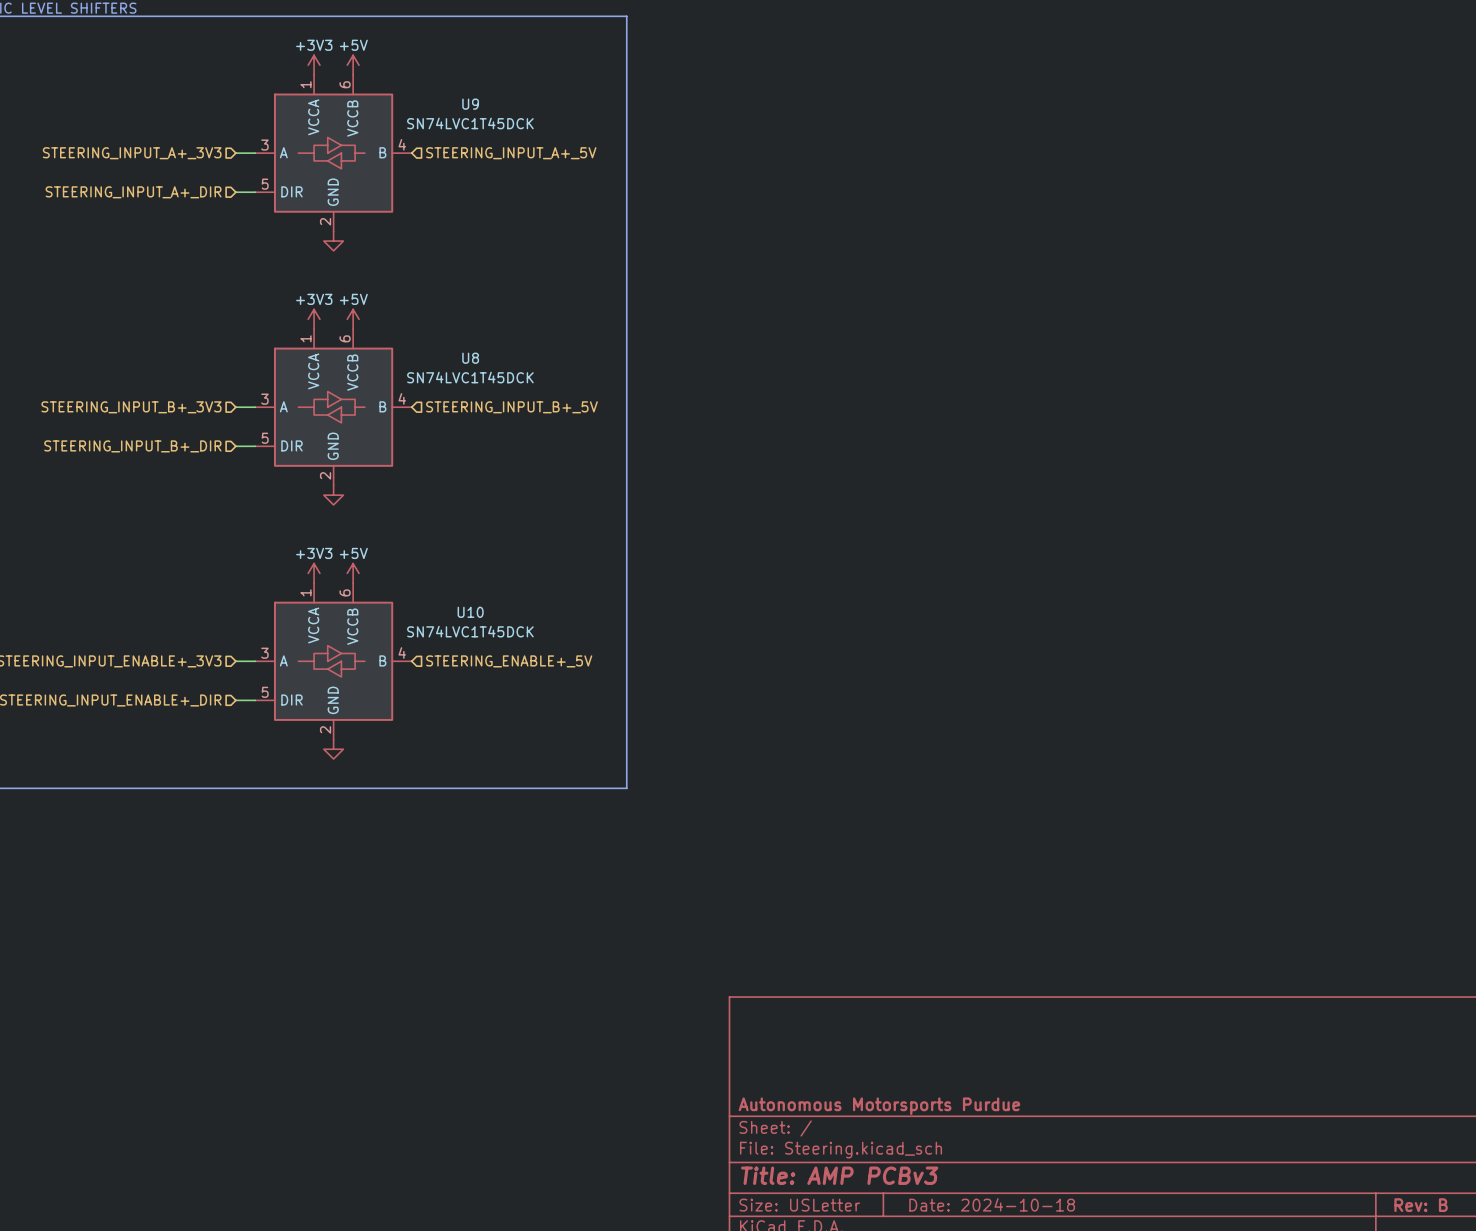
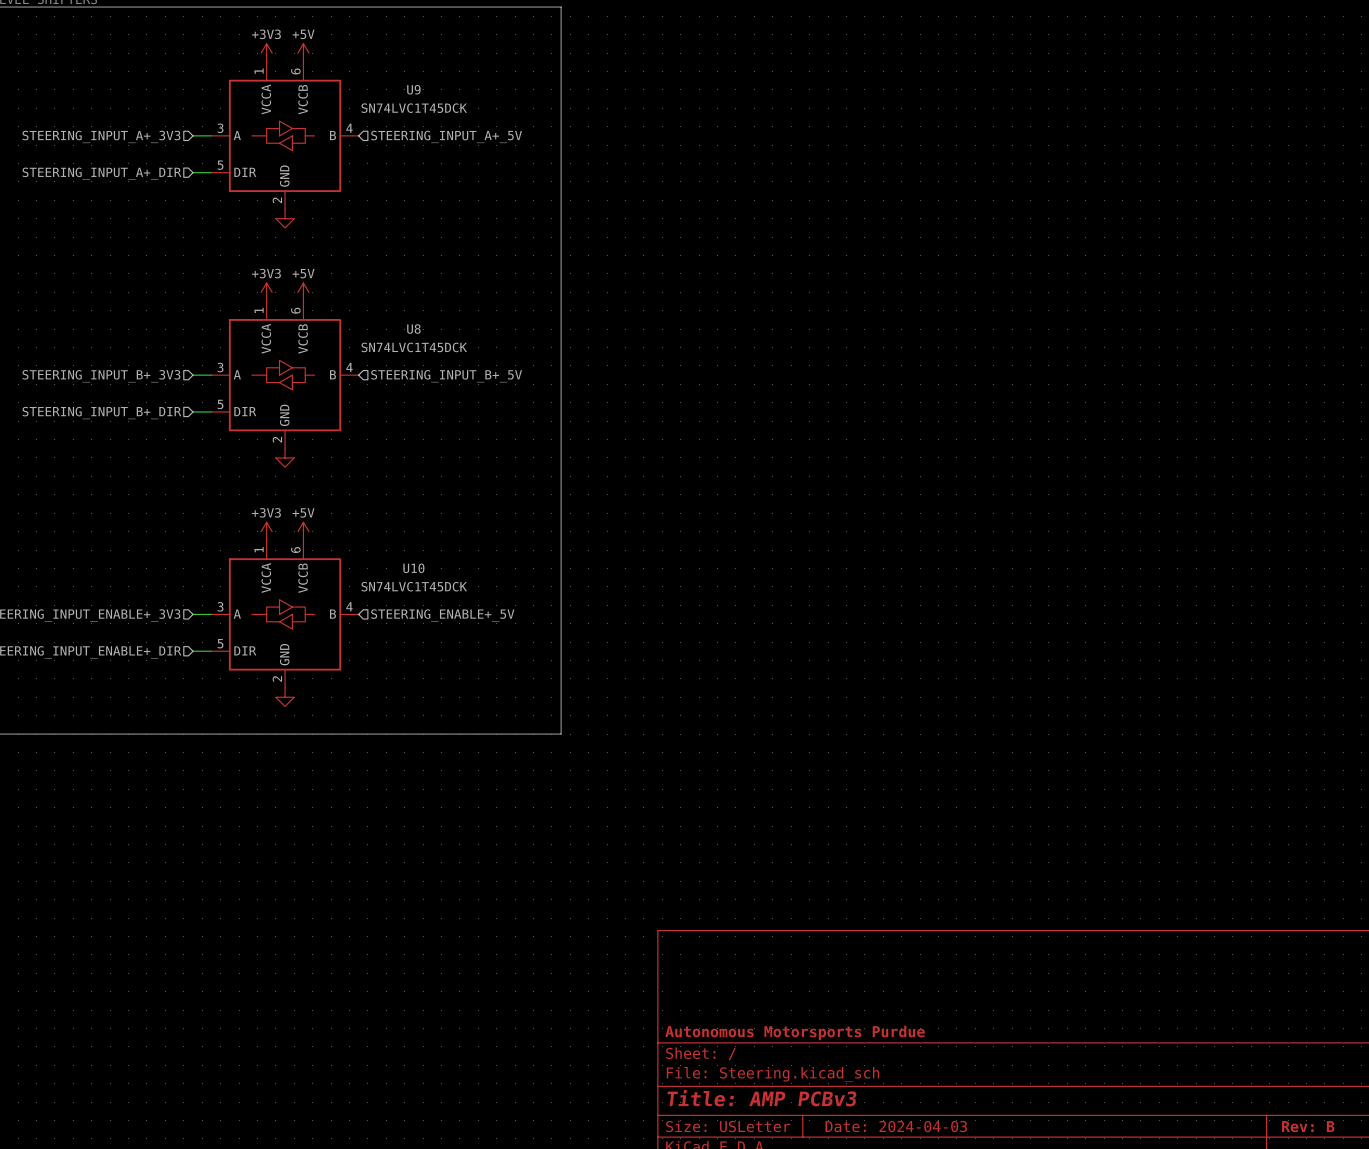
title block: Date: 2024-10-18 (992, 1204) -> Date: 2024-04-03 (896, 1126)

